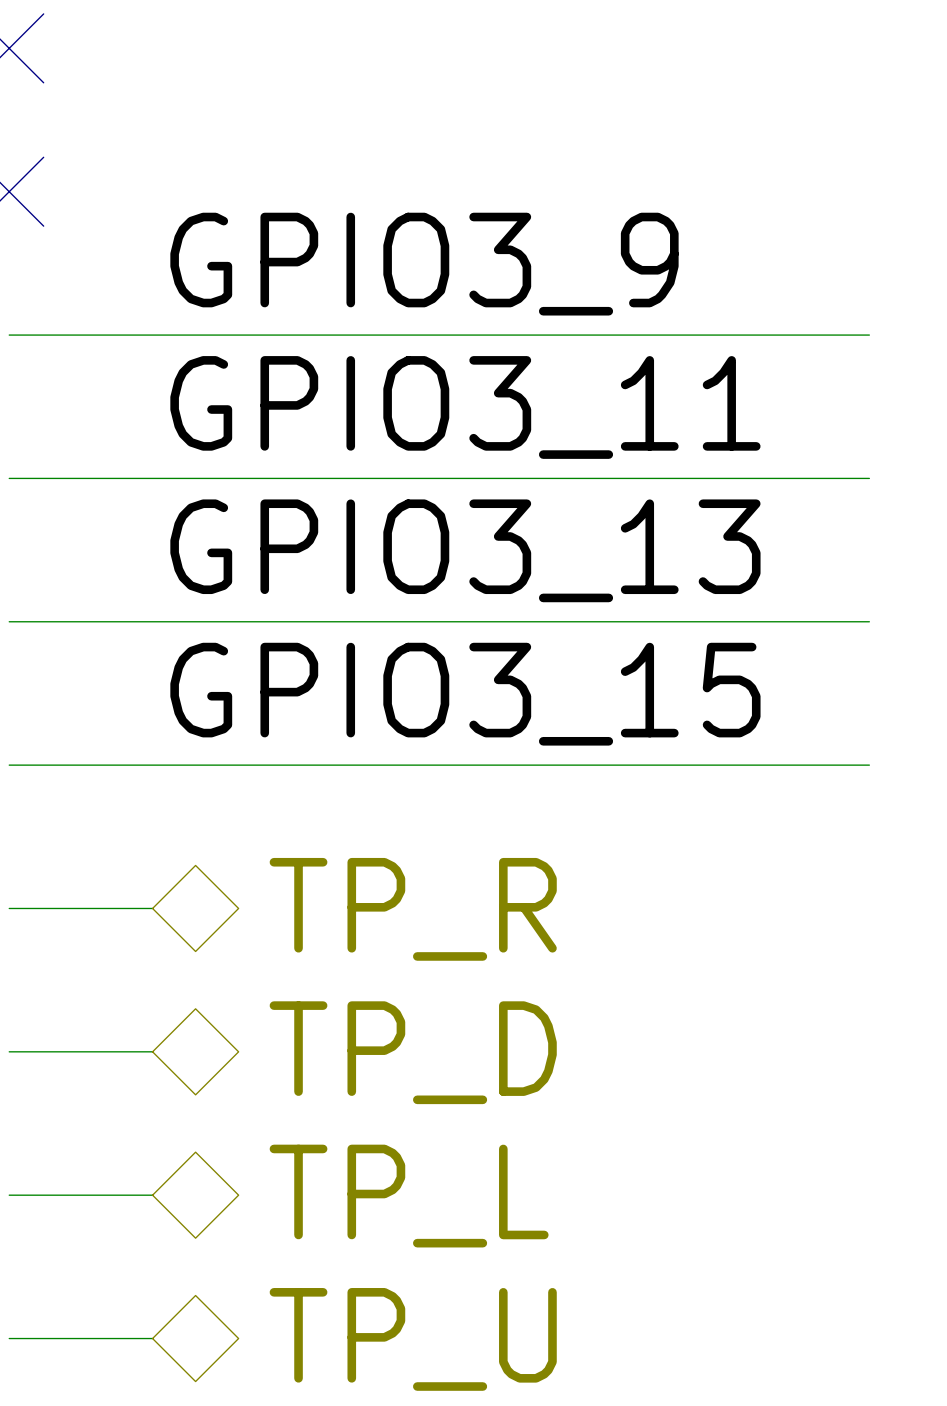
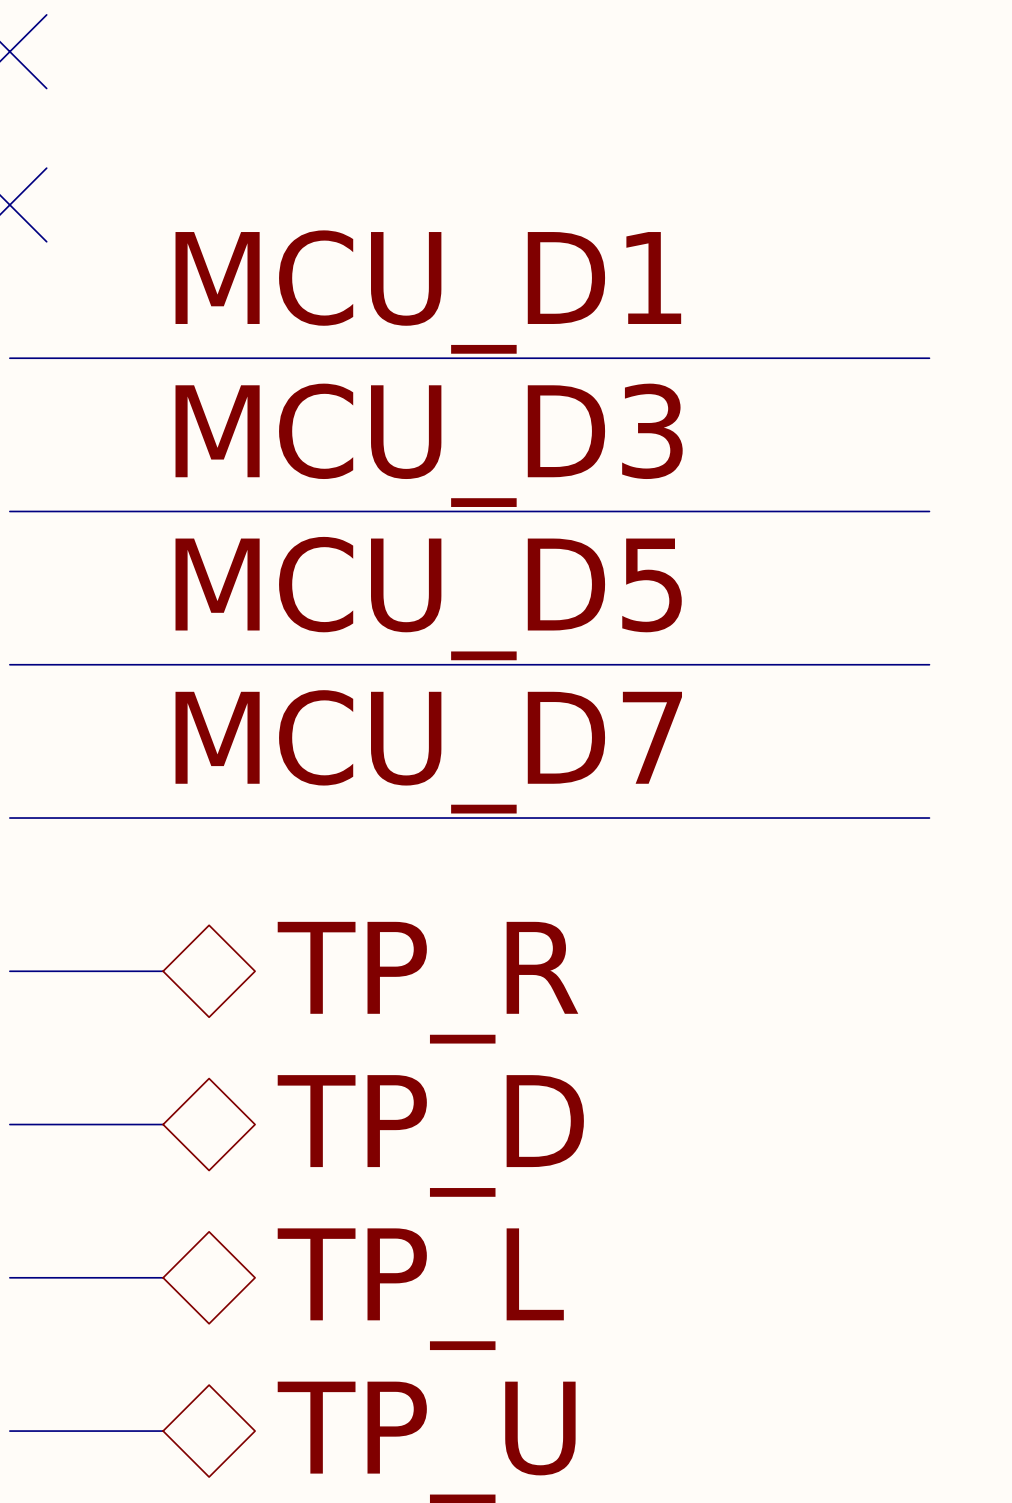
label: GPIO3_9 (424, 264) -> MCU_D1 (428, 292)
label: GPIO3_11 (465, 407) -> MCU_D3 (429, 445)
label: GPIO3_13 (465, 550) -> MCU_D5 (428, 598)
label: GPIO3_15 (465, 694) -> MCU_D7 (428, 751)

